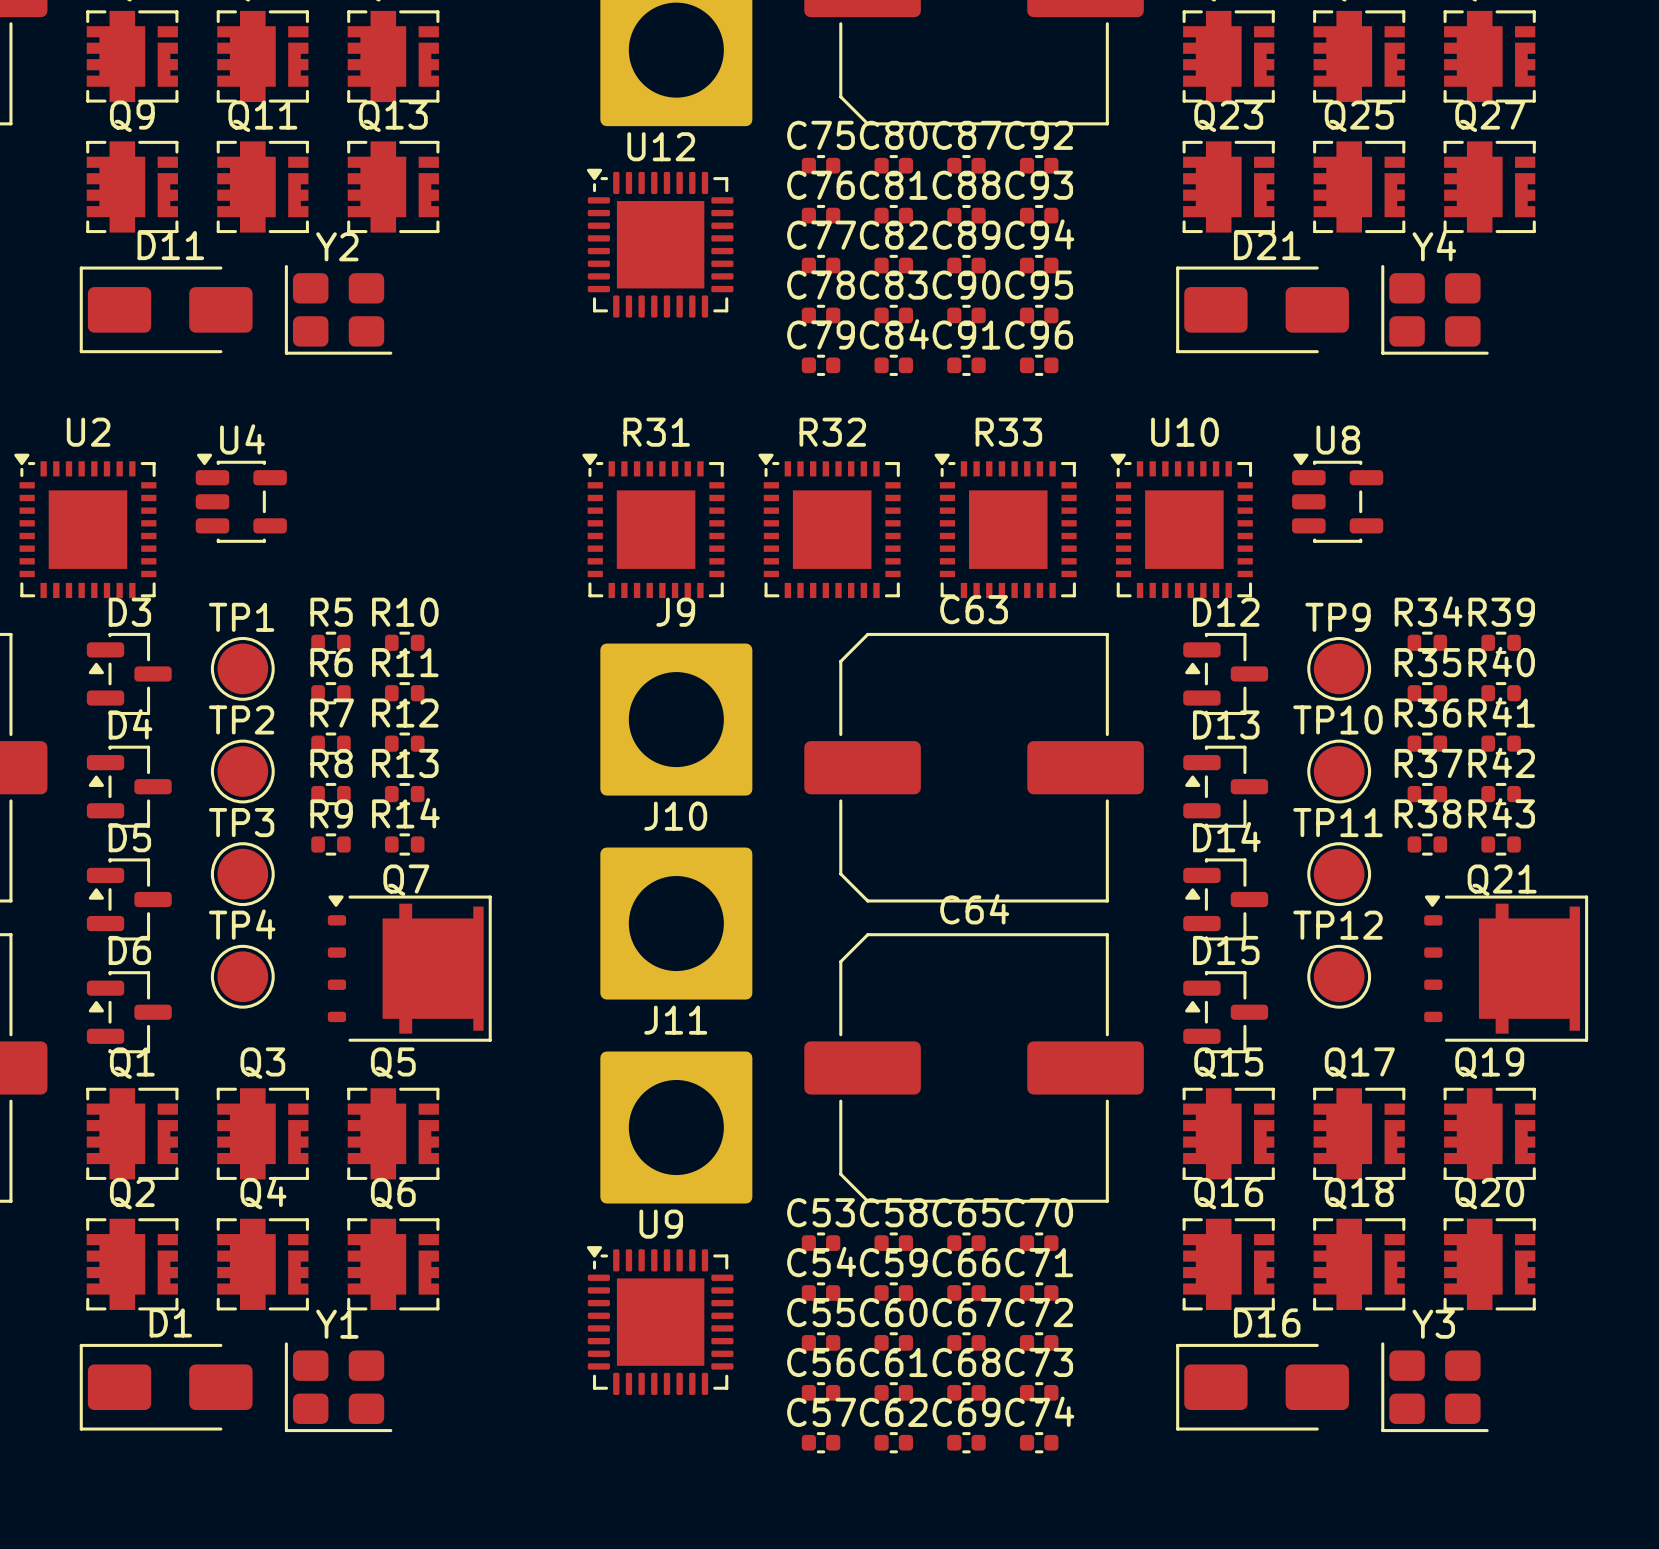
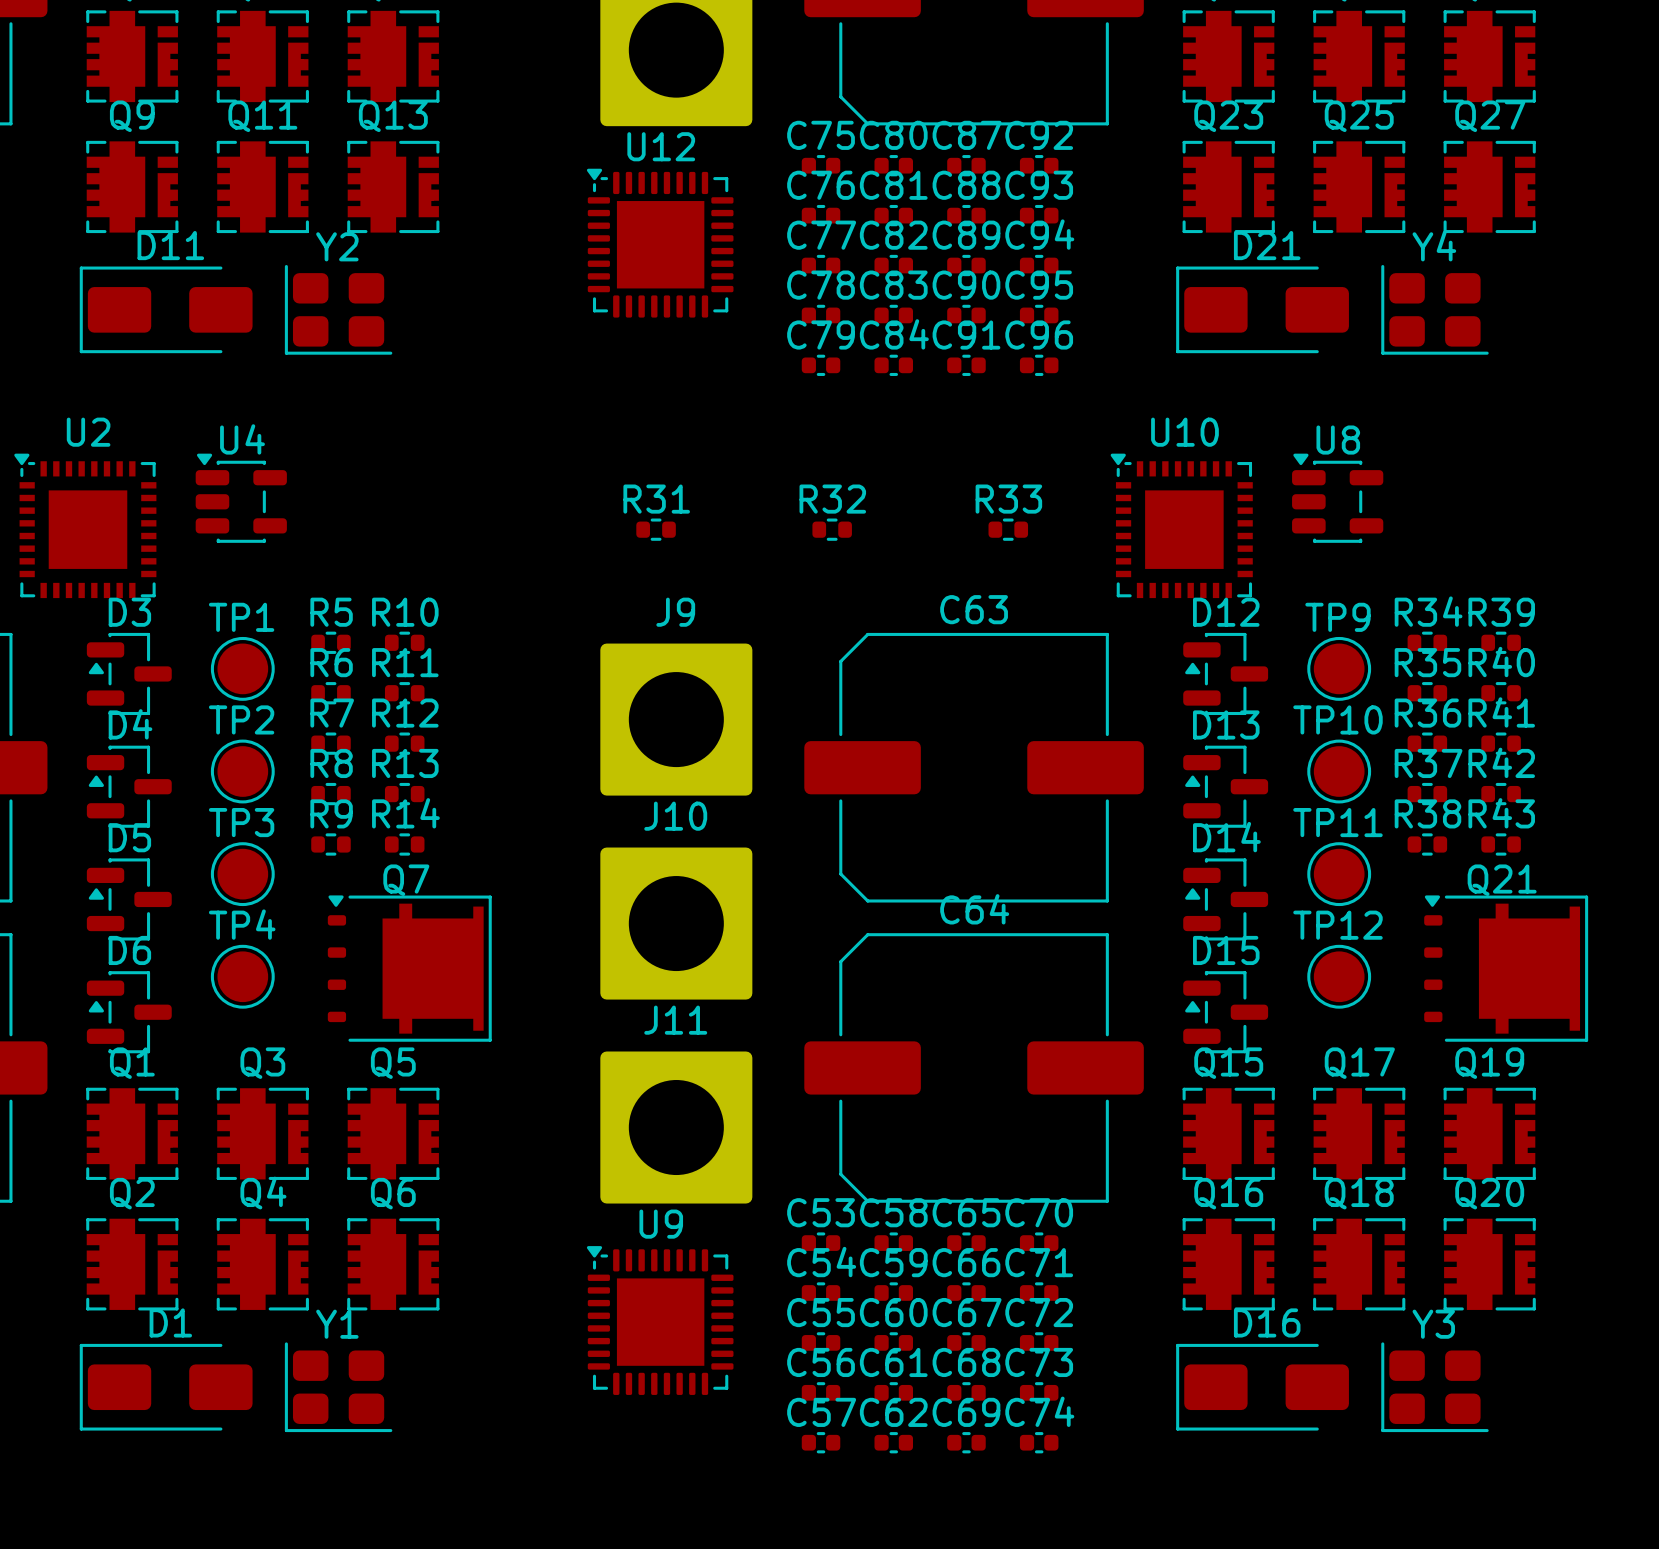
R31 name position: R31 (656, 432) -> R31 (656, 499)
R32 name position: R32 (832, 432) -> R32 (832, 499)
R33 name position: R33 (1008, 432) -> R33 (1008, 499)
R31 footprint: [582, 453, 725, 599] -> [636, 518, 676, 541]
R32 footprint: [758, 453, 901, 599] -> [812, 518, 852, 541]
R33 footprint: [934, 453, 1077, 599] -> [988, 518, 1029, 541]

